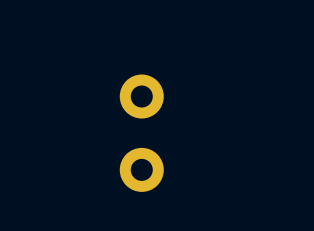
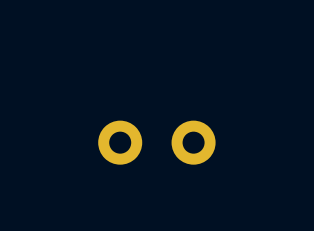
part rotation: 0° (141, 133) -> 90° clockwise (156, 142)

